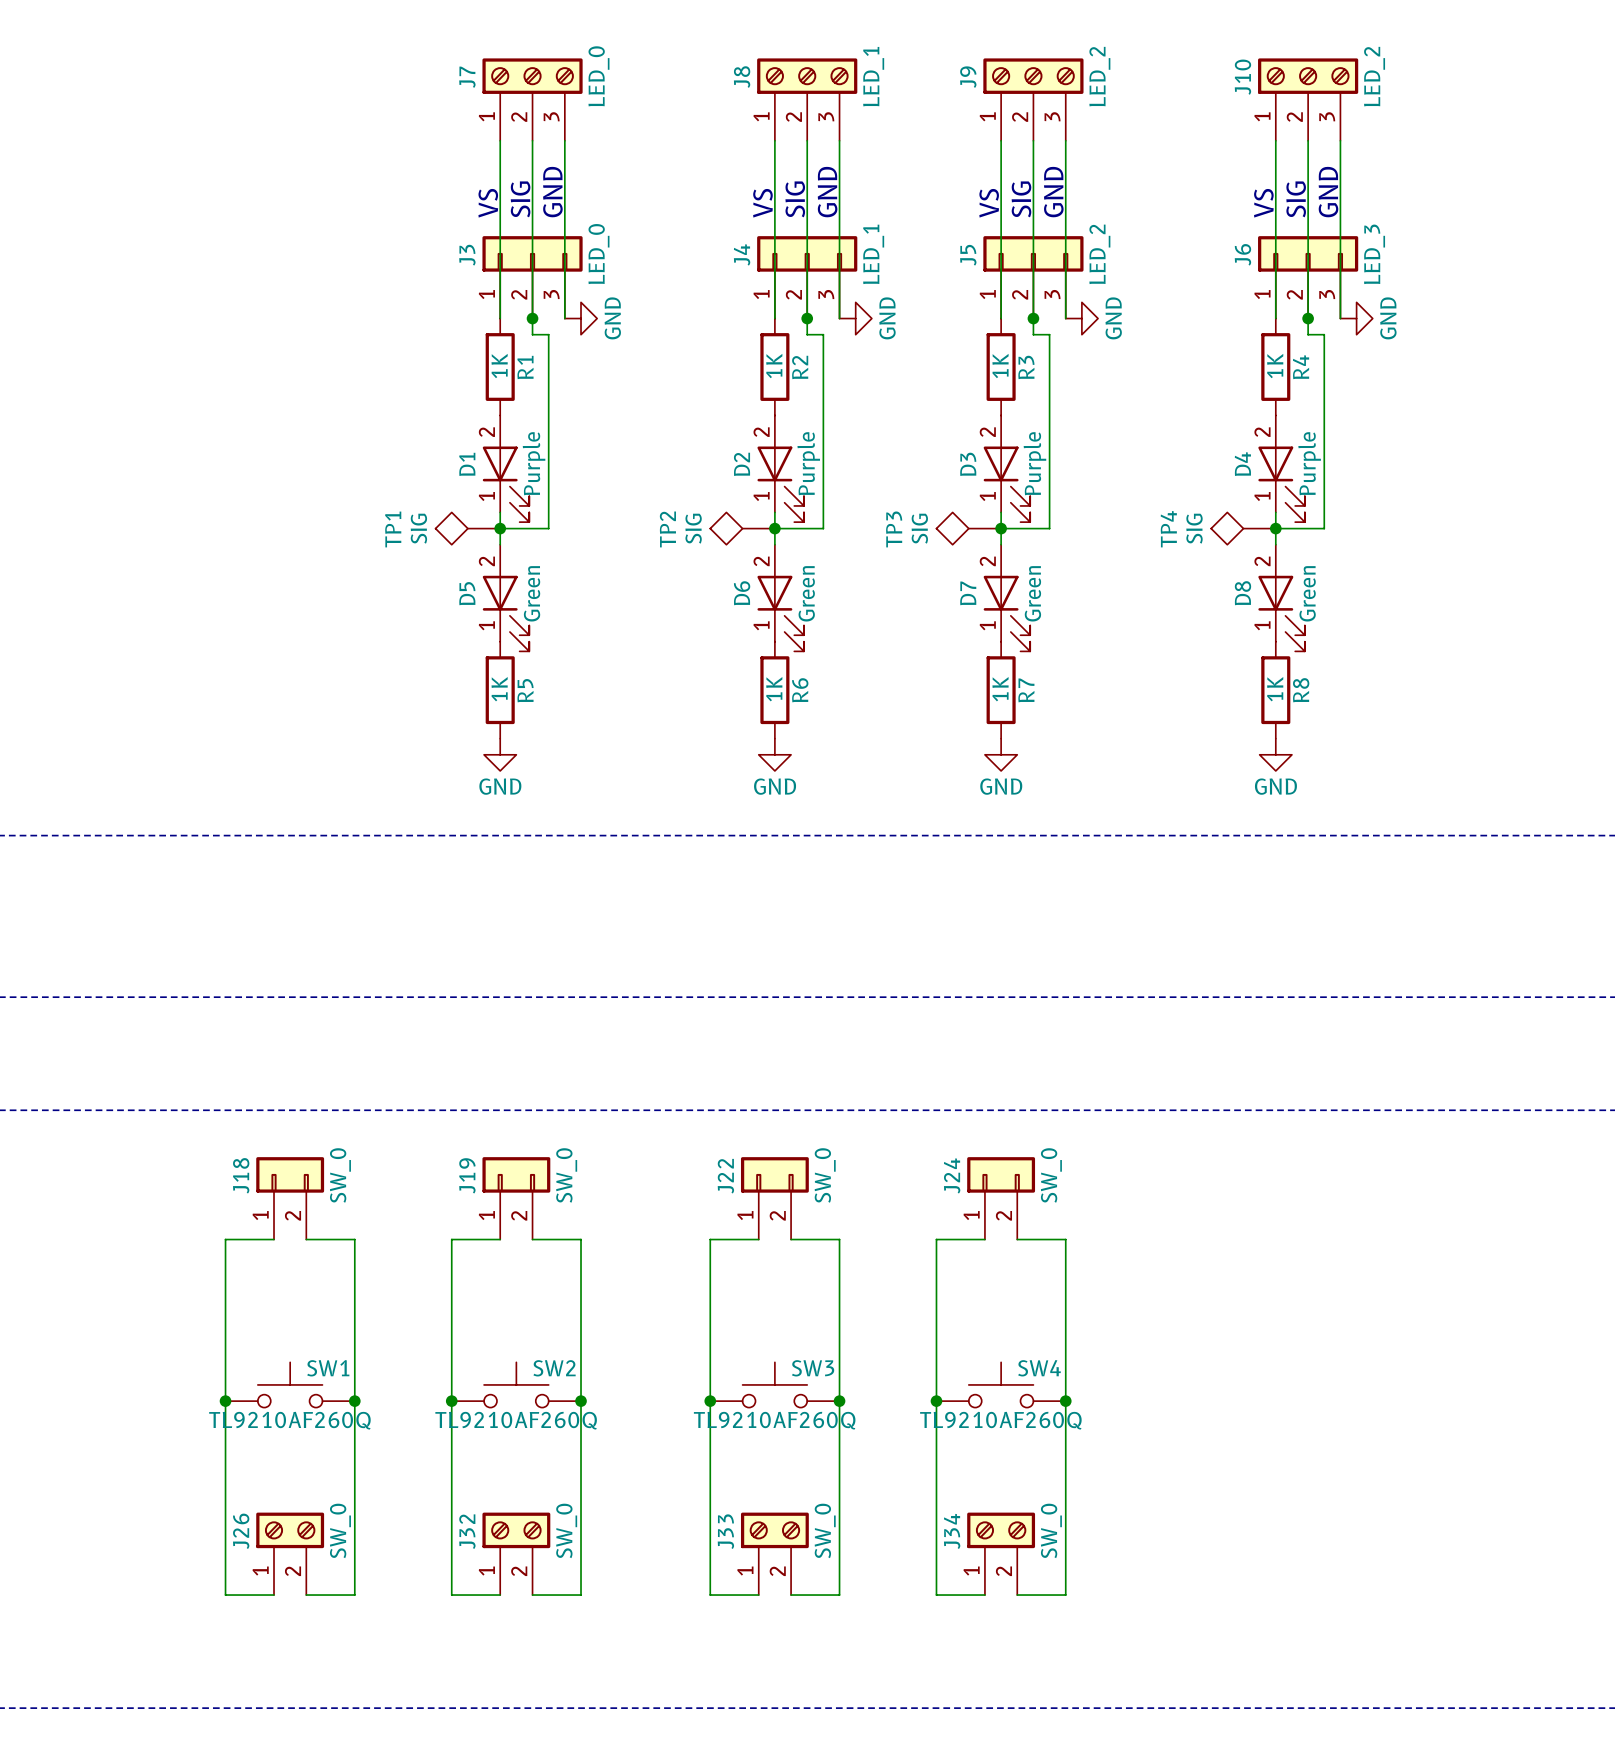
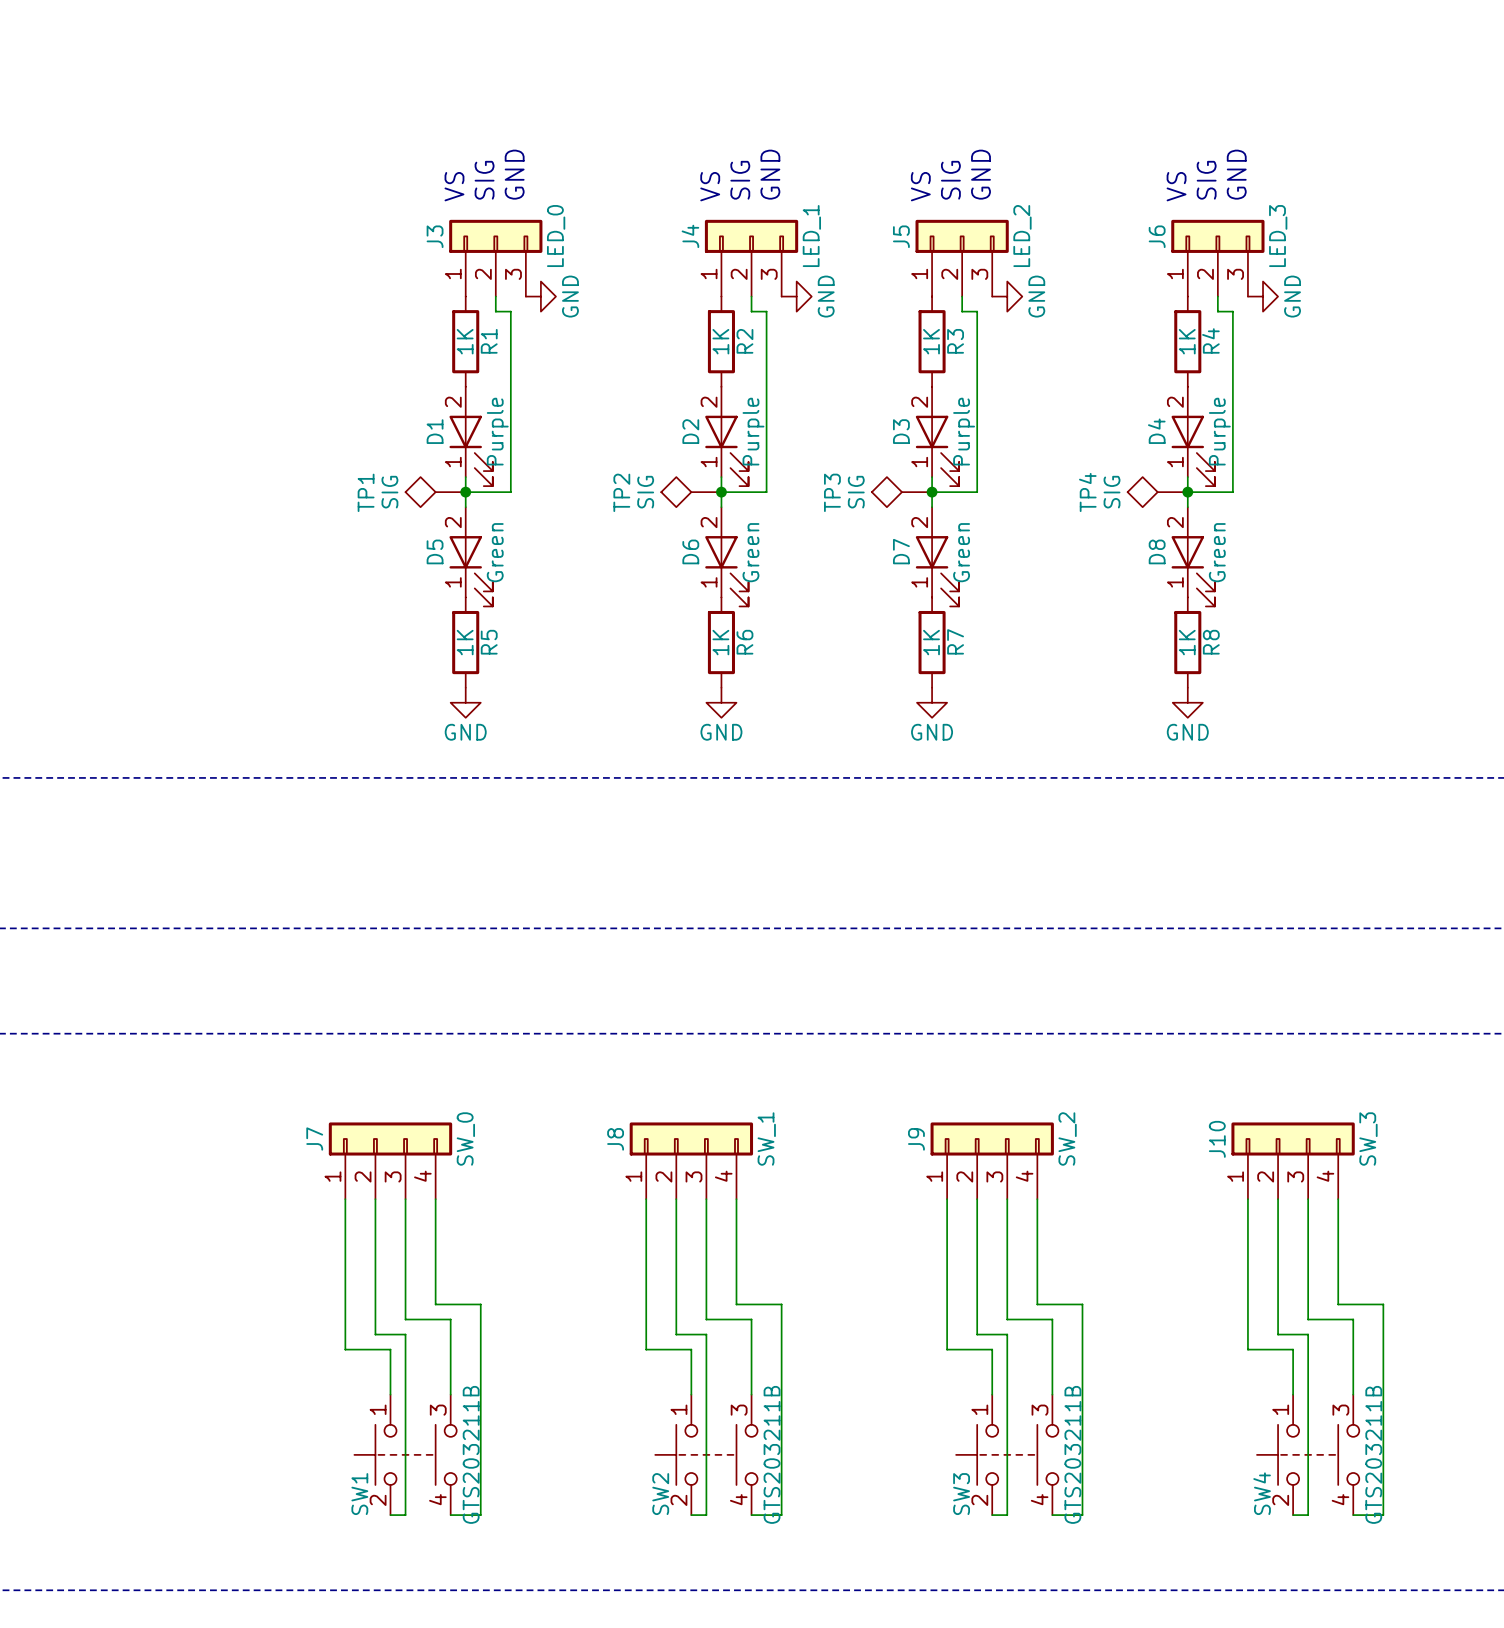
J7 symbol: [482, 58, 583, 141] -> [328, 1122, 453, 1200]
J8 symbol: [757, 58, 858, 141] -> [629, 1122, 754, 1200]
J9 symbol: [983, 58, 1084, 141] -> [930, 1122, 1054, 1200]
J10 symbol: [1258, 58, 1359, 141] -> [1231, 1122, 1355, 1200]
J7 value: LED_0 (598, 76) -> SW_0 (465, 1138)
J8 value: LED_1 (873, 76) -> SW_1 (766, 1138)
J9 value: LED_2 (1099, 76) -> SW_2 (1067, 1138)
J10 value: LED_2 (1374, 76) -> SW_3 (1368, 1138)
wire: (500, 140) (500, 318) -> none
wire: (532, 140) (532, 318) -> none
wire: (564, 140) (564, 318) -> none
wire: (774, 140) (774, 318) -> none
wire: (807, 140) (807, 318) -> none
wire: (839, 140) (839, 318) -> none
wire: (1001, 140) (1001, 318) -> none
wire: (1033, 140) (1033, 318) -> none
wire: (1065, 140) (1065, 318) -> none
wire: (1275, 140) (1275, 318) -> none
wire: (1308, 140) (1308, 318) -> none
wire: (1340, 140) (1340, 318) -> none
junction: (532, 318) -> none
junction: (807, 318) -> none
junction: (1033, 318) -> none
junction: (1308, 318) -> none
J18: SW_0 (290, 1198) -> none
J19: SW_0 (516, 1198) -> none
J22: SW_0 (774, 1198) -> none
J24: SW_0 (1001, 1198) -> none
wire: (274, 1239) (225, 1239) (225, 1595) (274, 1595) -> none
wire: (306, 1239) (354, 1239) (354, 1595) (306, 1595) -> none
wire: (500, 1239) (451, 1239) (451, 1595) (500, 1595) -> none
wire: (532, 1239) (581, 1239) (581, 1595) (532, 1595) -> none
wire: (758, 1239) (710, 1239) (710, 1595) (758, 1595) -> none
wire: (791, 1239) (839, 1239) (839, 1401) -> (736, 1199) (736, 1304) (781, 1304)
wire: (984, 1239) (936, 1239) (936, 1595) (984, 1595) -> none
wire: (1017, 1239) (1065, 1239) (1065, 1449) -> (947, 1199) (947, 1349) (992, 1349)
wire: none -> (345, 1199) (345, 1349) (390, 1349) (390, 1394)
wire: none -> (375, 1199) (375, 1334) (405, 1334) (405, 1515) (390, 1515)
wire: none -> (405, 1199) (405, 1319) (450, 1319) (450, 1394)
wire: none -> (435, 1199) (435, 1304) (480, 1304) (480, 1515) (450, 1515)
wire: none -> (646, 1199) (646, 1349) (691, 1349) (691, 1394)
wire: none -> (676, 1199) (676, 1334) (706, 1334) (706, 1515) (691, 1515)
wire: none -> (706, 1199) (706, 1319) (751, 1319) (751, 1394)
wire: none -> (977, 1199) (977, 1334) (1007, 1334) (1007, 1515) (992, 1515)
wire: none -> (1007, 1199) (1007, 1319) (1052, 1319) (1052, 1394)
wire: none -> (1037, 1199) (1037, 1304) (1082, 1304) (1082, 1515) (1052, 1515)
wire: none -> (1247, 1199) (1247, 1349) (1293, 1349) (1293, 1394)
wire: none -> (1278, 1199) (1278, 1334) (1308, 1334) (1308, 1515) (1293, 1515)
wire: none -> (1308, 1199) (1308, 1319) (1353, 1319) (1353, 1394)
wire: none -> (1338, 1199) (1338, 1304) (1383, 1304) (1383, 1515) (1353, 1515)
SW1 symbol: [225, 1362, 355, 1408] -> [354, 1394, 457, 1516]
SW2 symbol: [451, 1362, 582, 1408] -> [655, 1394, 758, 1516]
SW3 symbol: [710, 1362, 840, 1408] -> [956, 1394, 1059, 1516]
SW4 symbol: [936, 1362, 1066, 1408] -> [1256, 1394, 1360, 1516]
SW1 name position: SW1 (328, 1368) -> SW1 (359, 1494)
SW2 name position: SW2 (554, 1368) -> SW2 (660, 1494)
SW3 name position: SW3 (813, 1368) -> SW3 (961, 1494)
SW4 name position: SW4 (1039, 1368) -> SW4 (1262, 1493)
junction: (225, 1401) -> none
junction: (354, 1401) -> none
junction: (451, 1401) -> none
junction: (581, 1401) -> none
junction: (710, 1401) -> none
junction: (839, 1401) -> none
junction: (936, 1401) -> none
junction: (1065, 1401) -> none
SW1 value: TL9210AF260Q (289, 1420) -> GTS203211B (471, 1454)
SW2 value: TL9210AF260Q (516, 1420) -> GTS203211B (772, 1454)
SW3 value: TL9210AF260Q (774, 1420) -> GTS203211B (1072, 1454)
SW4 value: TL9210AF260Q (1000, 1420) -> GTS203211B (1373, 1454)
wire: (1065, 1498) (1065, 1595) (1017, 1595) -> none
J26: SW_0 (290, 1553) -> none
J32: SW_0 (516, 1553) -> none
J33: SW_0 (774, 1553) -> none
J34: SW_0 (1001, 1553) -> none
wire: (791, 1595) (839, 1595) -> (751, 1515) (781, 1515) (781, 1484)

